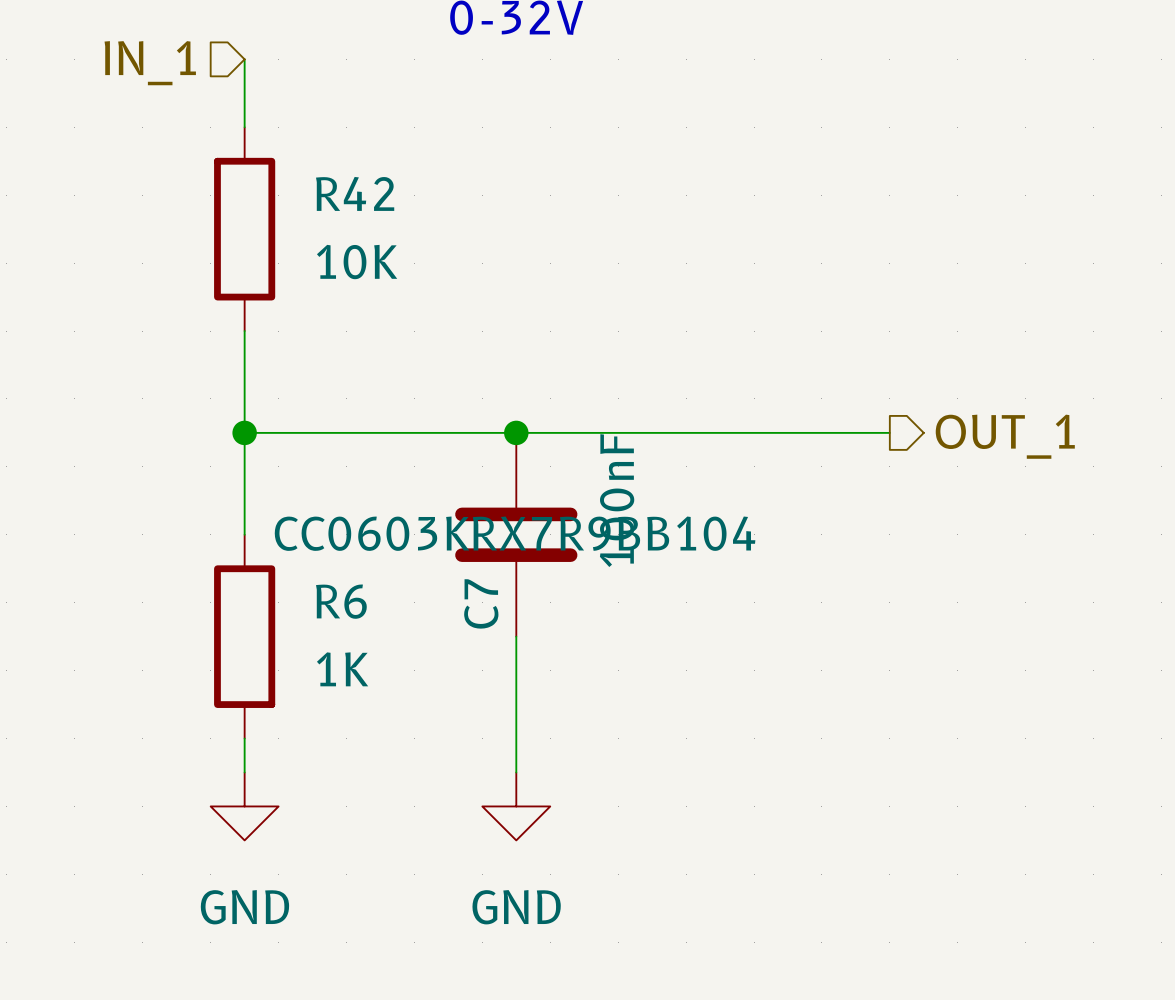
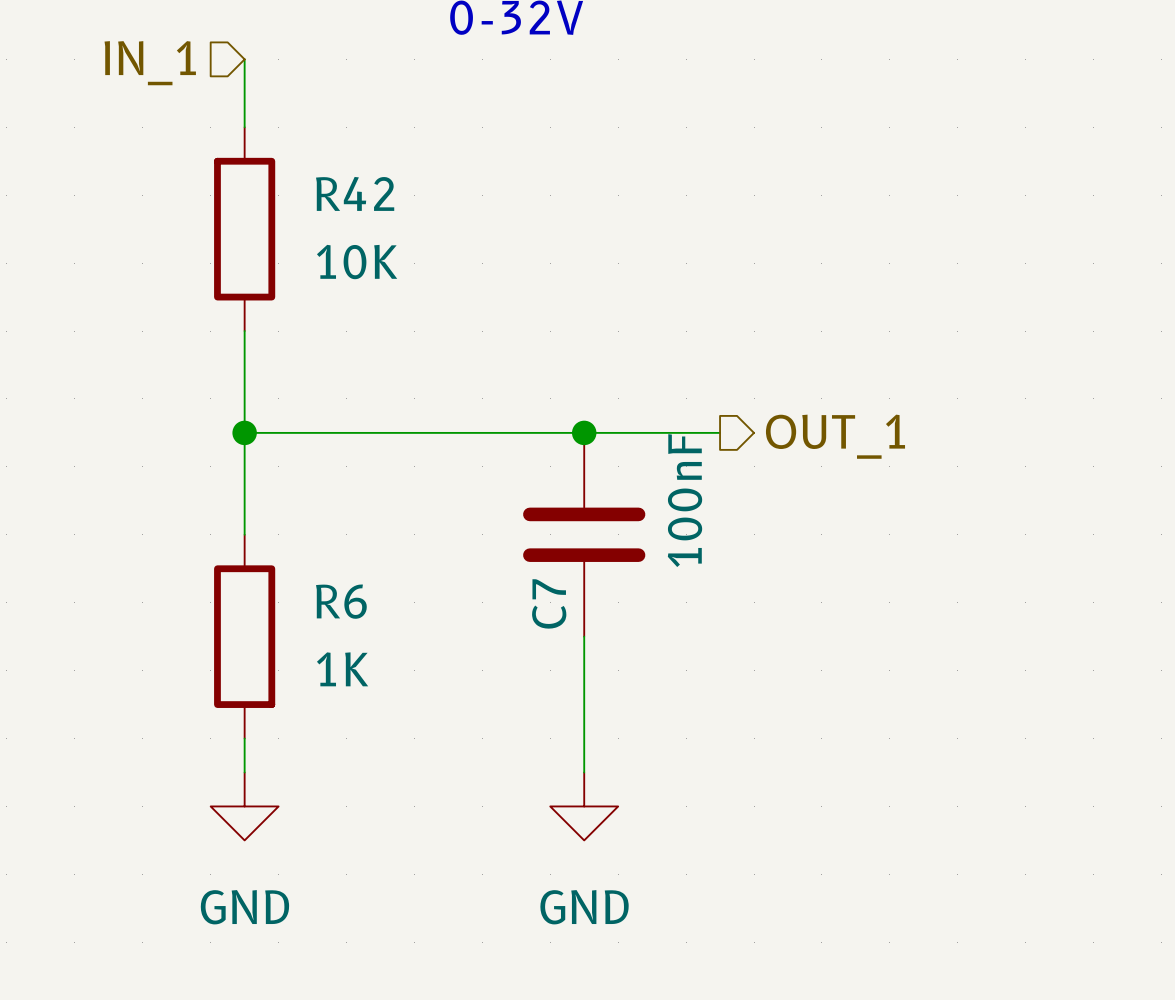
junction position: (516, 432) -> (584, 432)
wire: (720, 432) (889, 432) -> none
hierarchical label position: OUT_1 (1005, 436) -> OUT_1 (835, 436)
C7 text: CC0603KRX7R9BB104 (515, 533) -> none
C7 position: (516, 534) -> (584, 534)
wire: (516, 636) (516, 772) -> (584, 636) (584, 772)
power symbol position: GND (516, 806) -> GND (584, 806)

